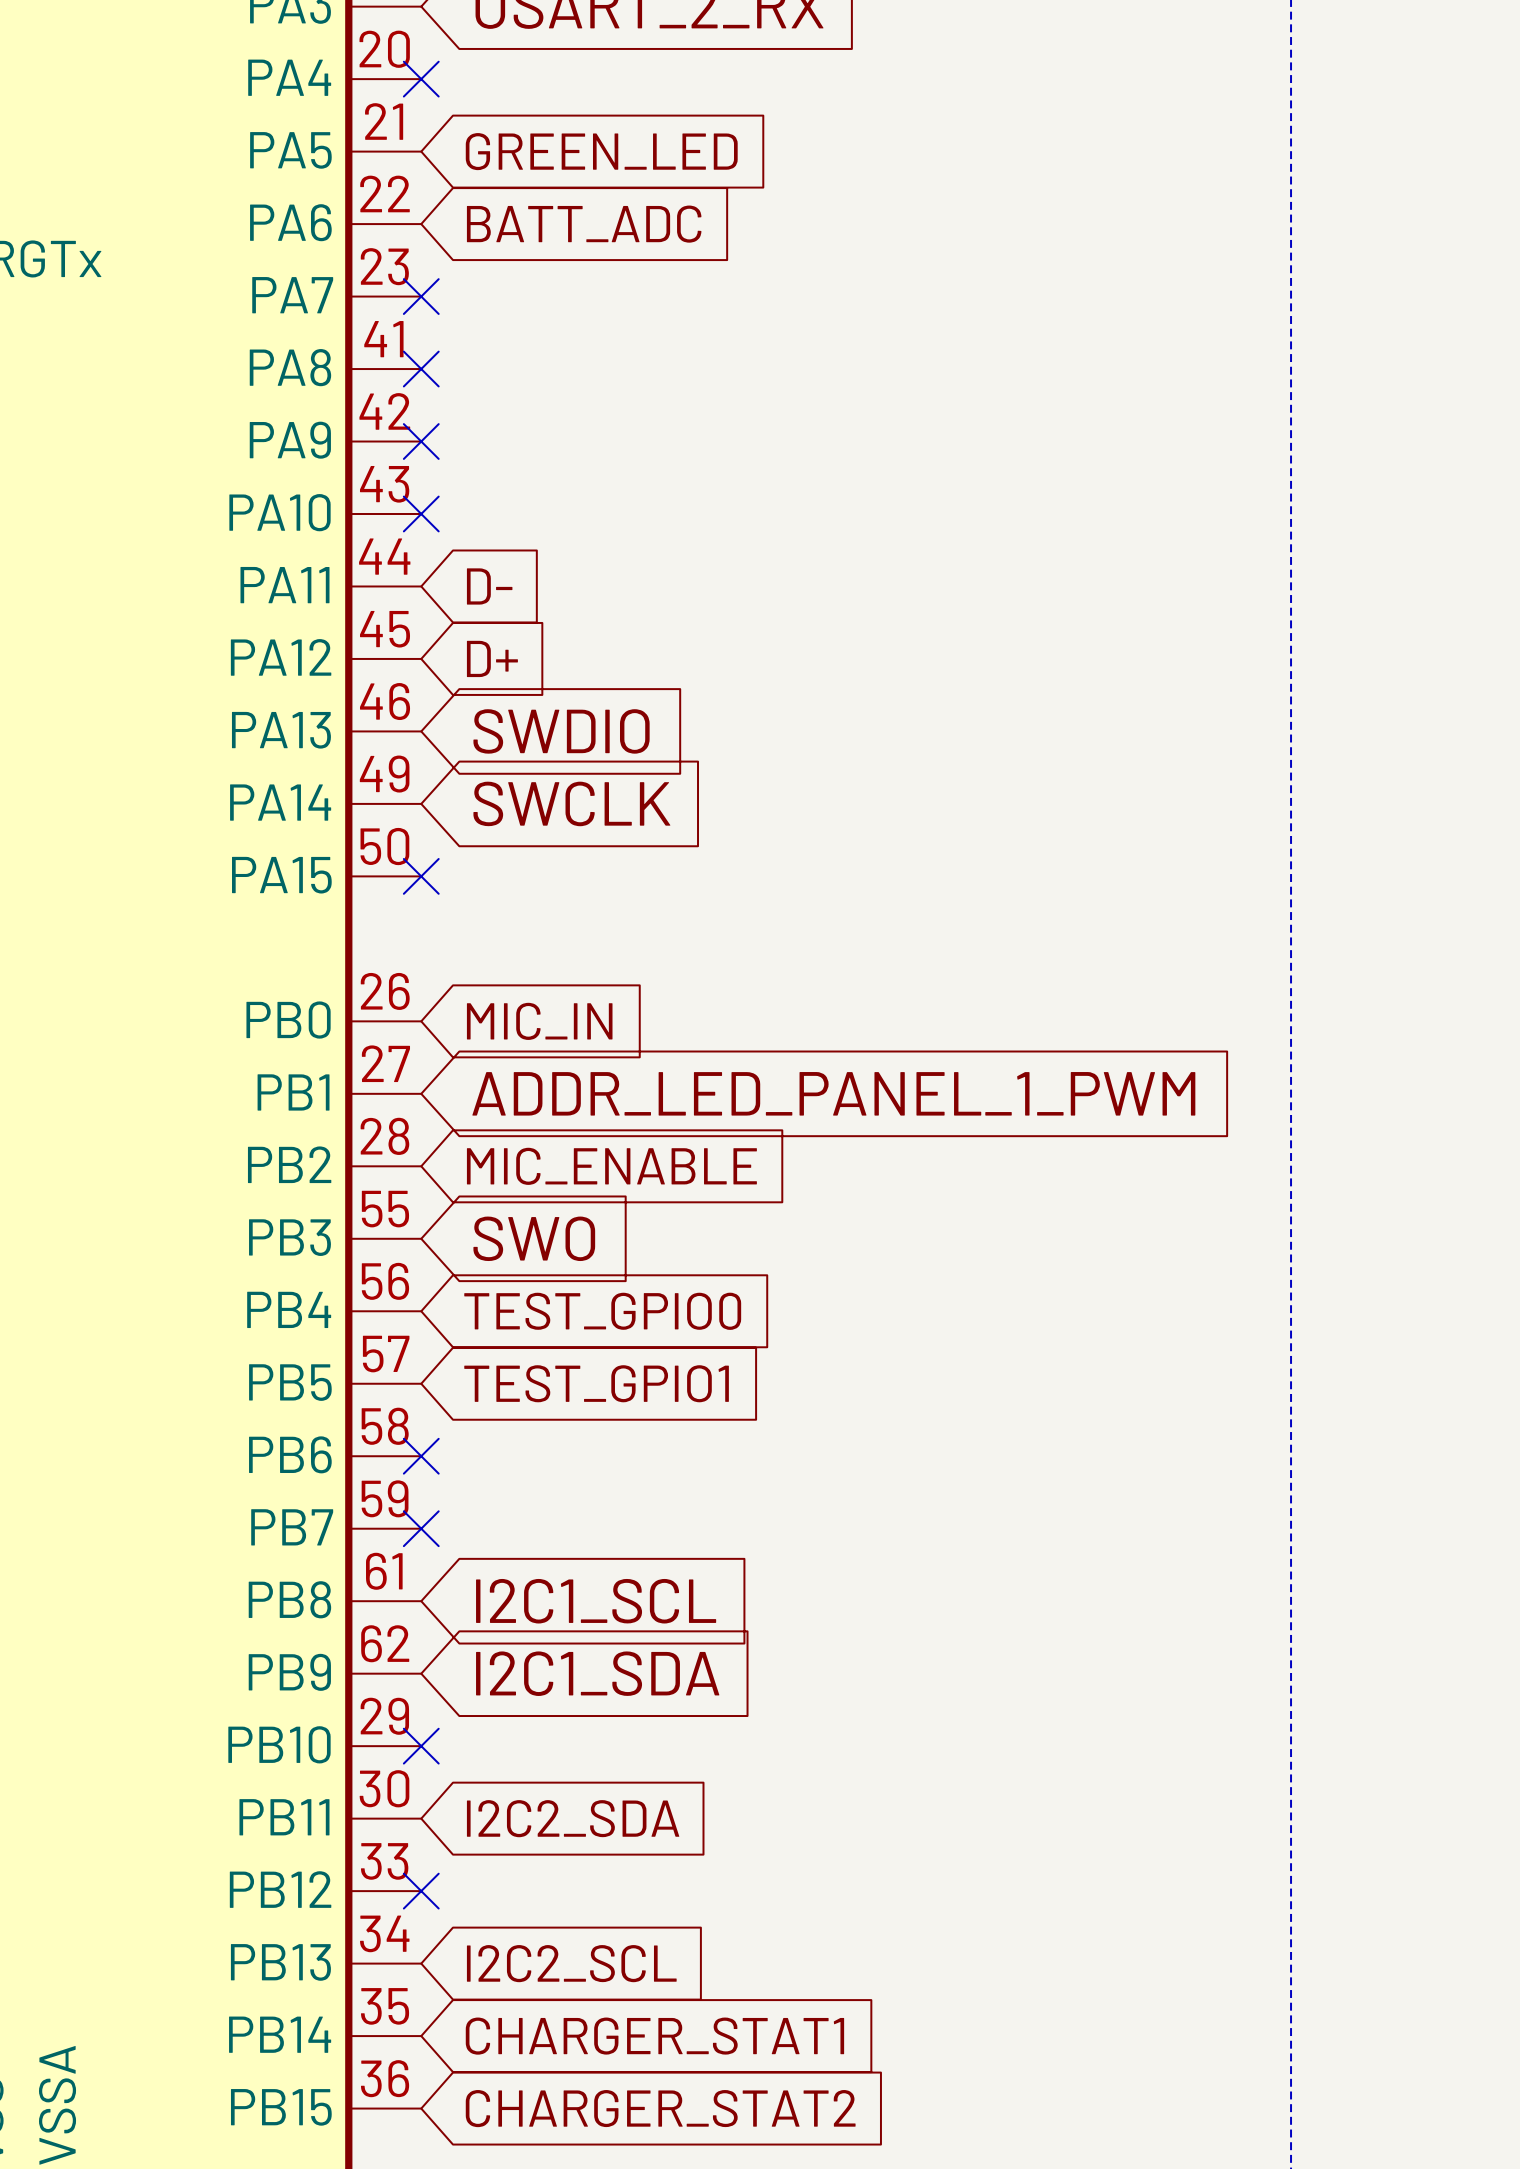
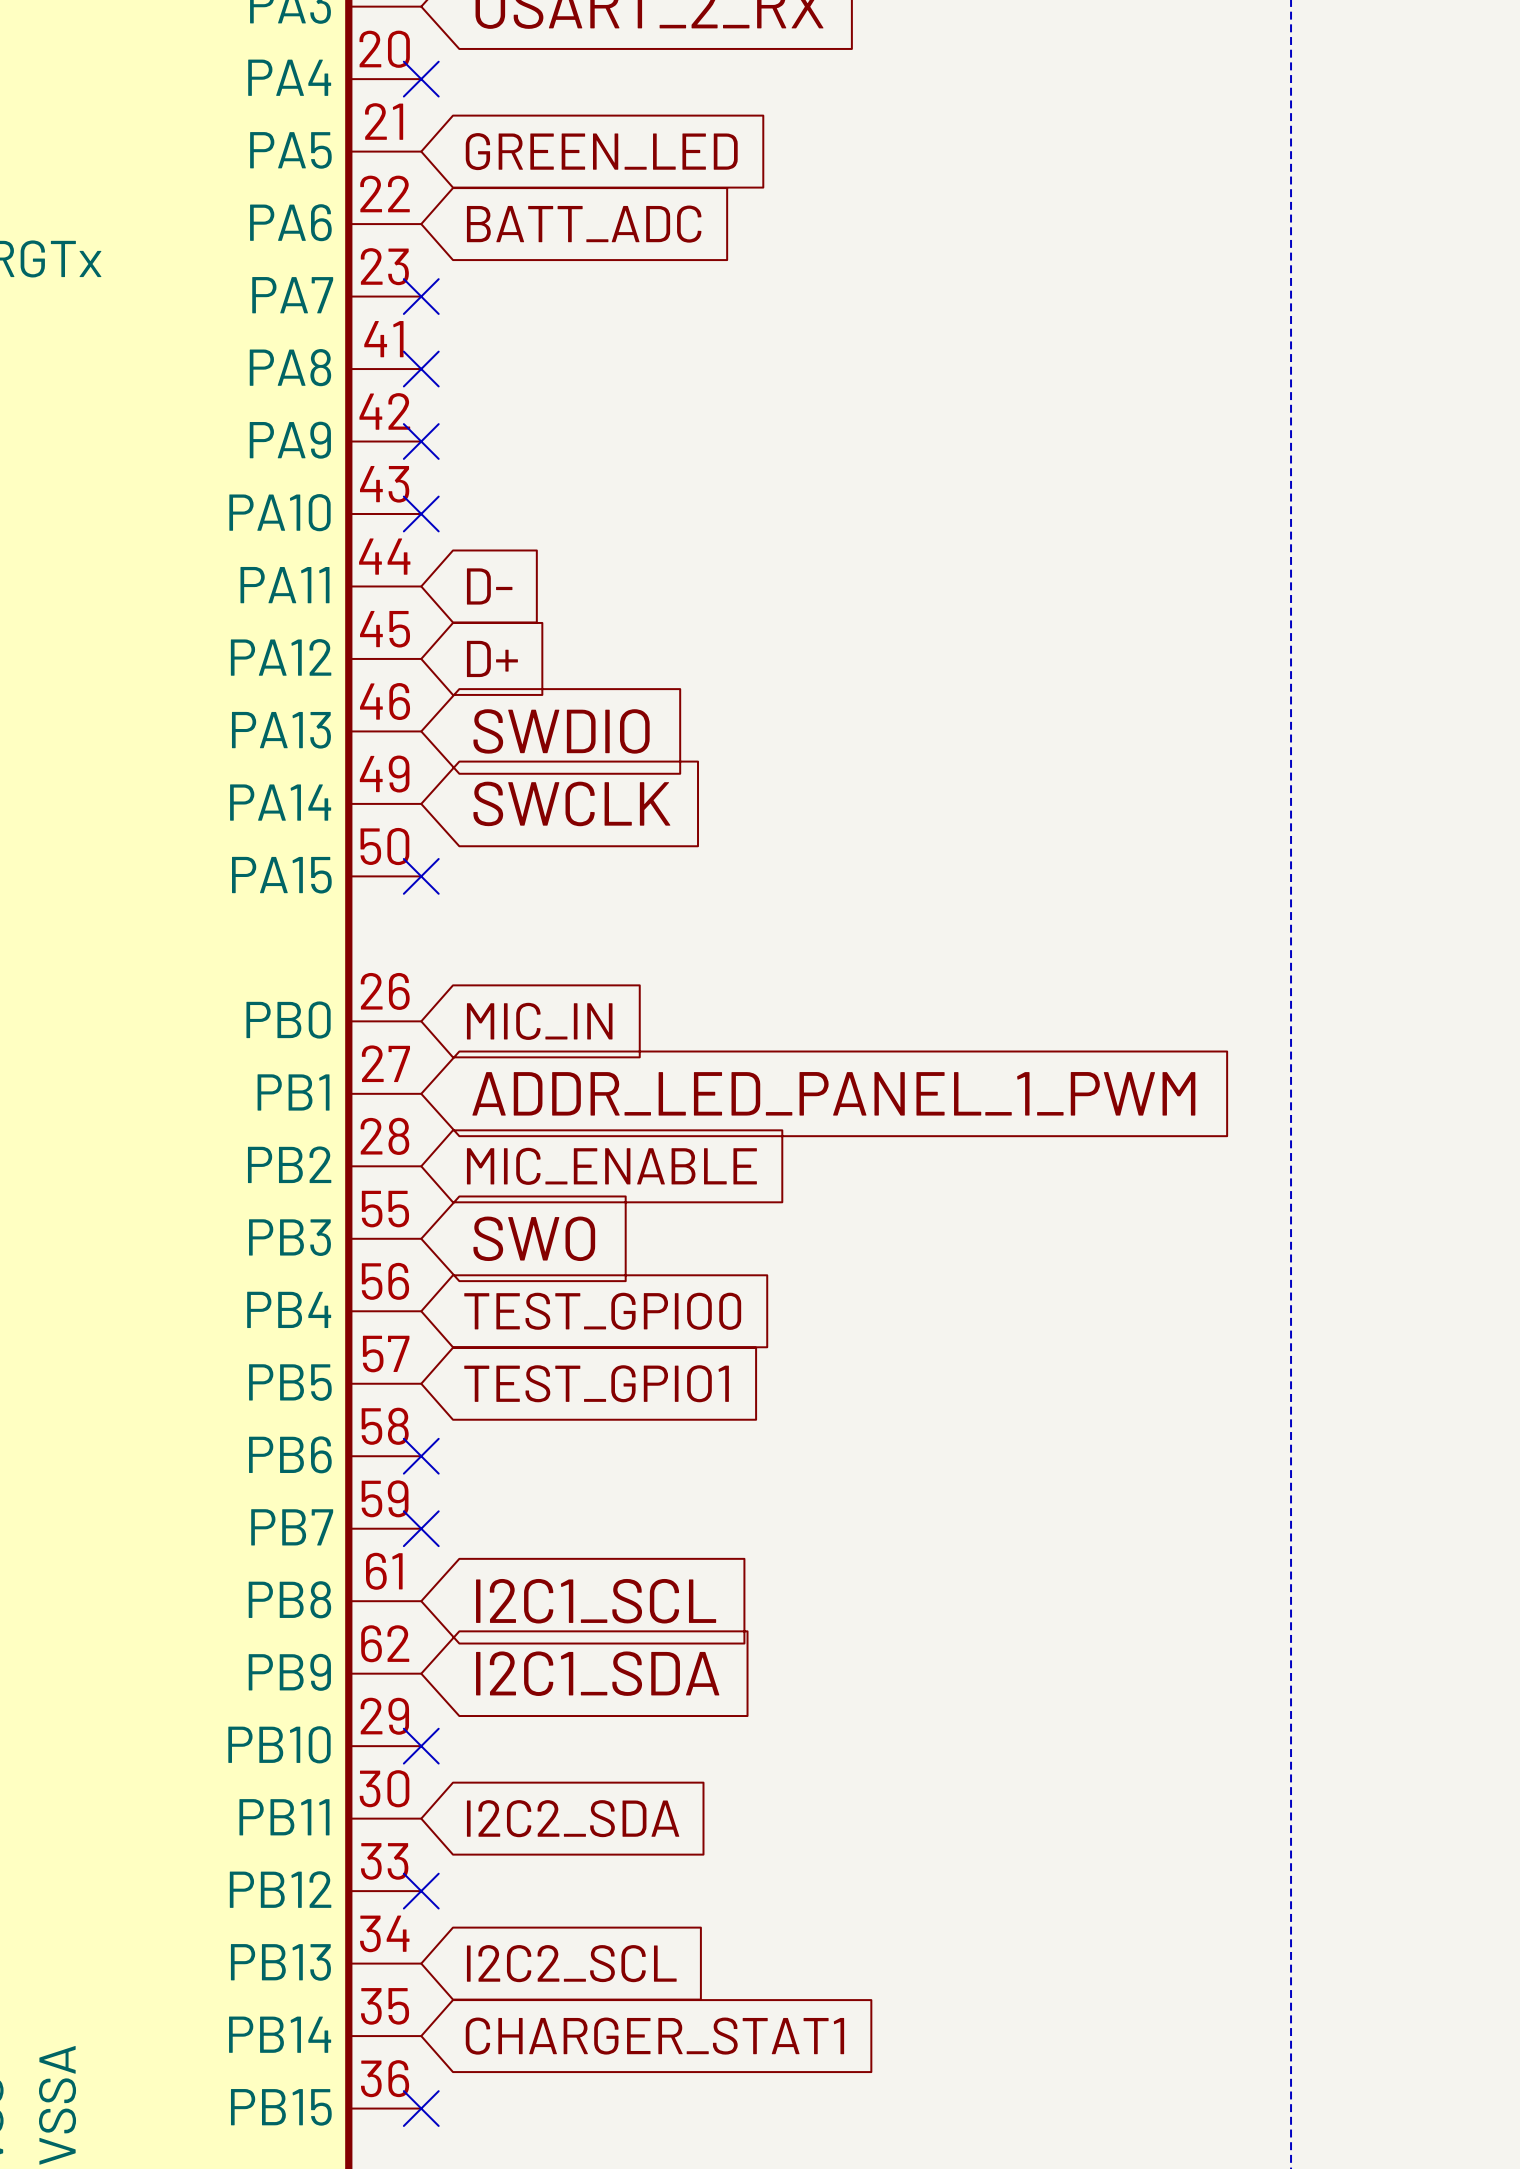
no-connect mark: none -> (421, 2108)
global label: CHARGER_STAT2 (660, 2108) -> none

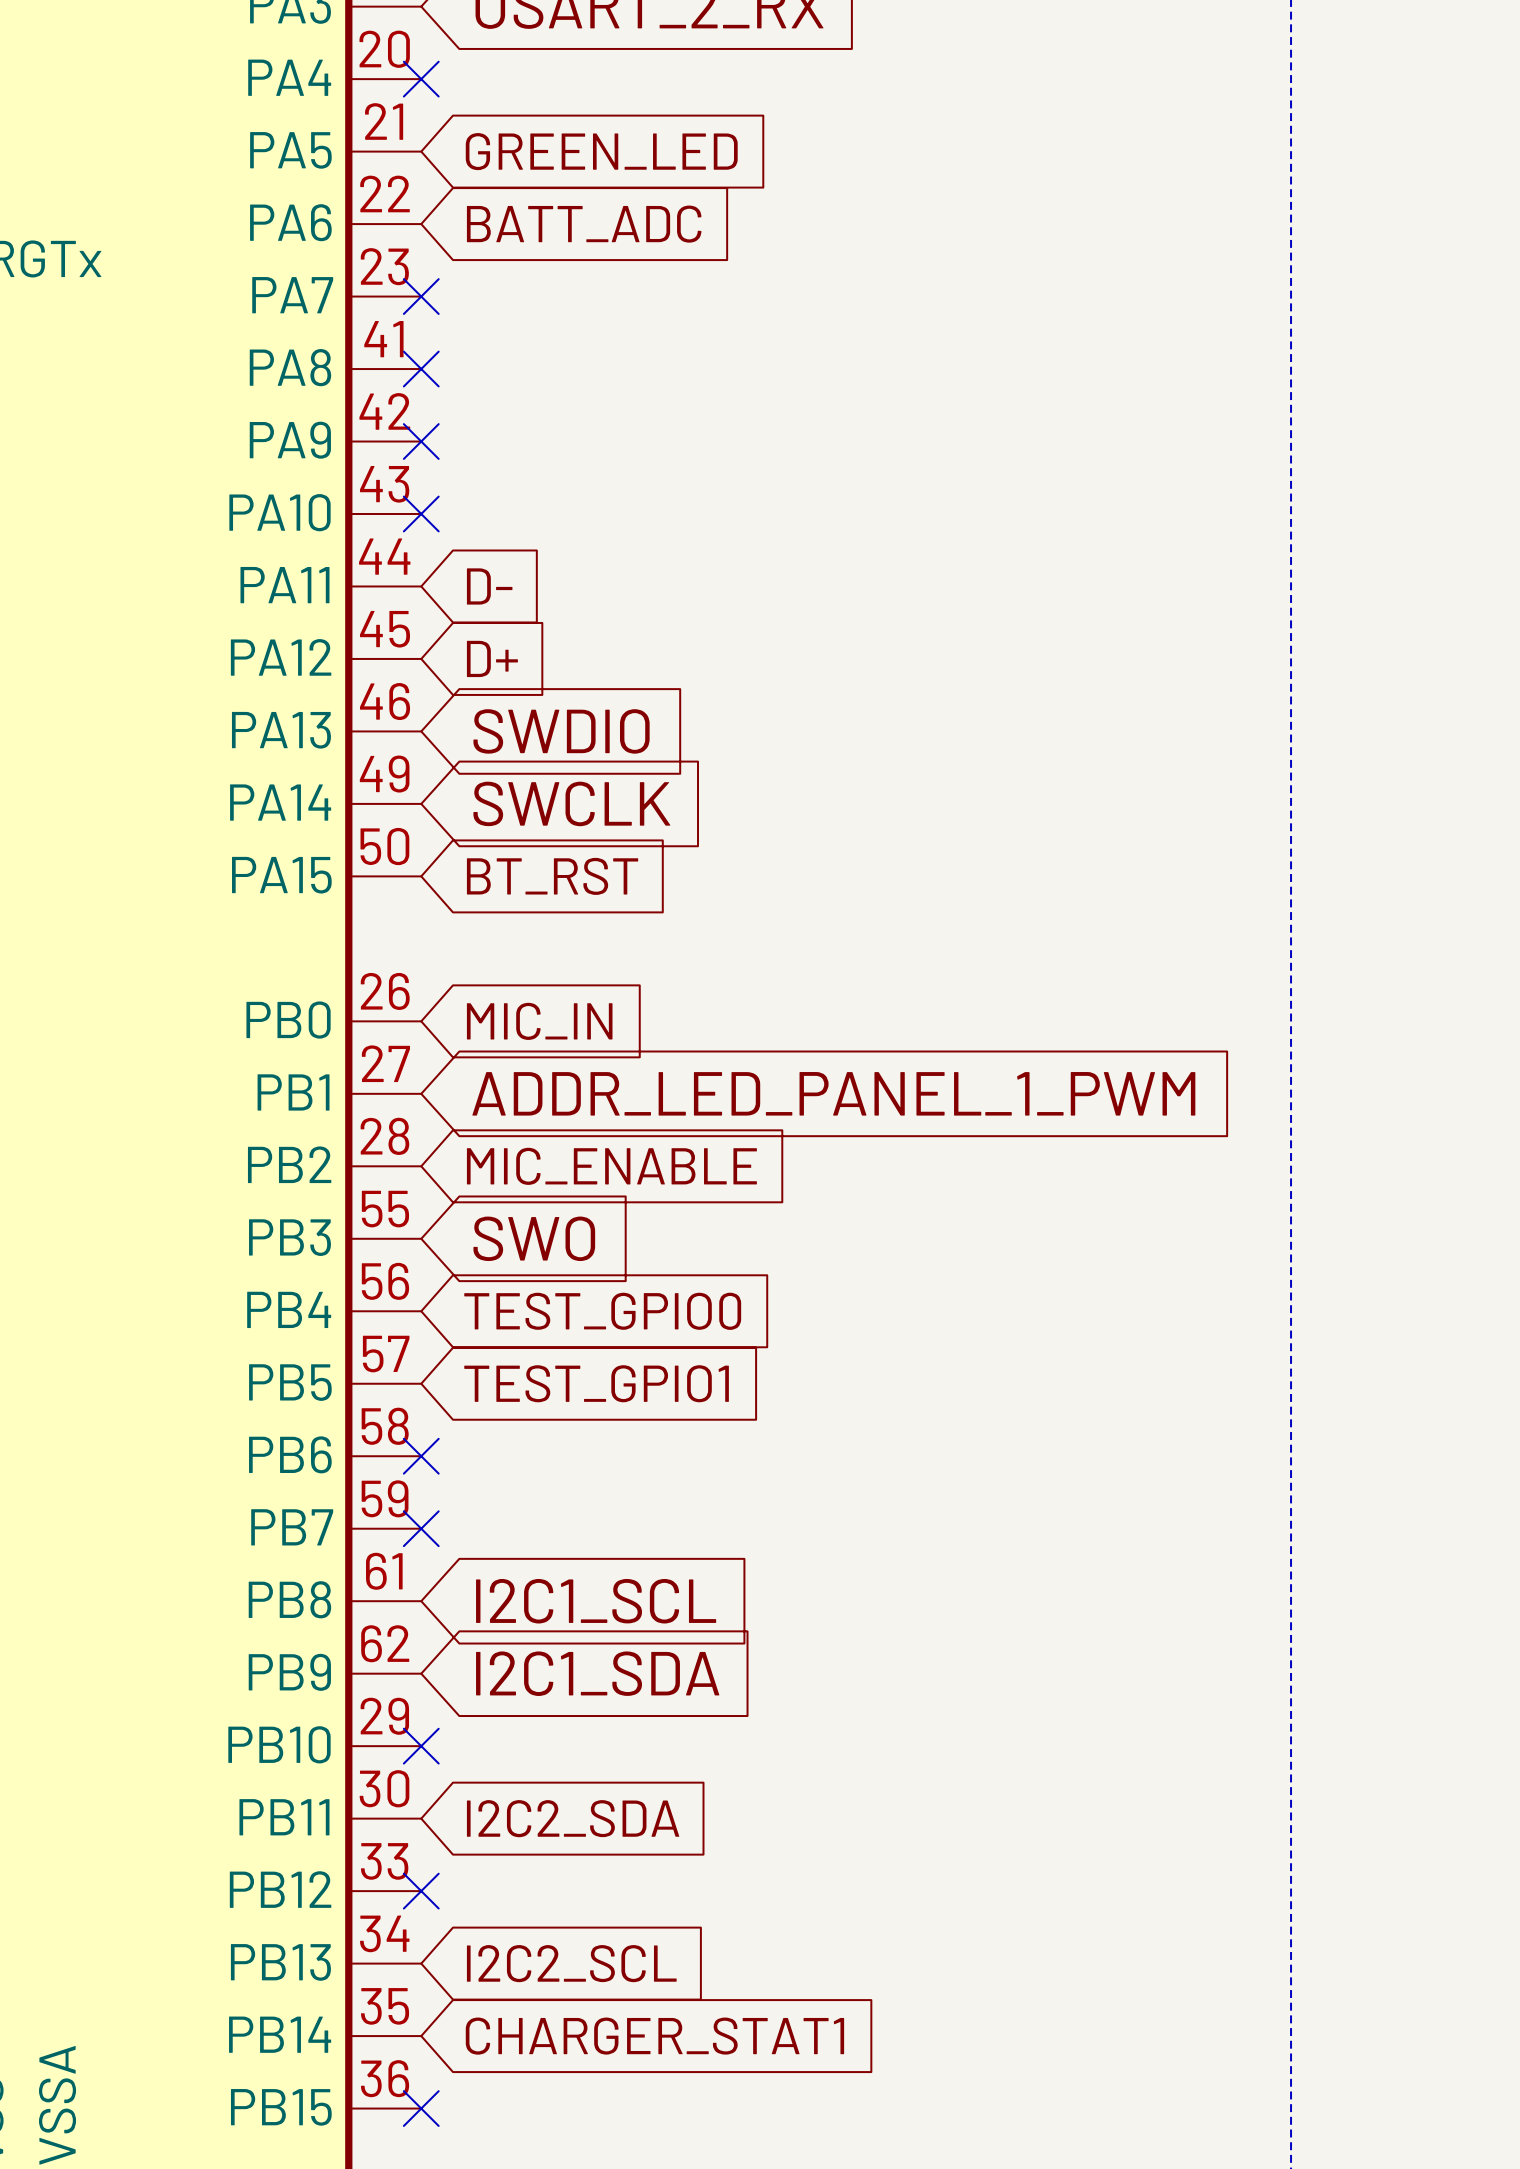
no-connect mark: (421, 876) -> none
global label: none -> BT_RST (552, 876)

